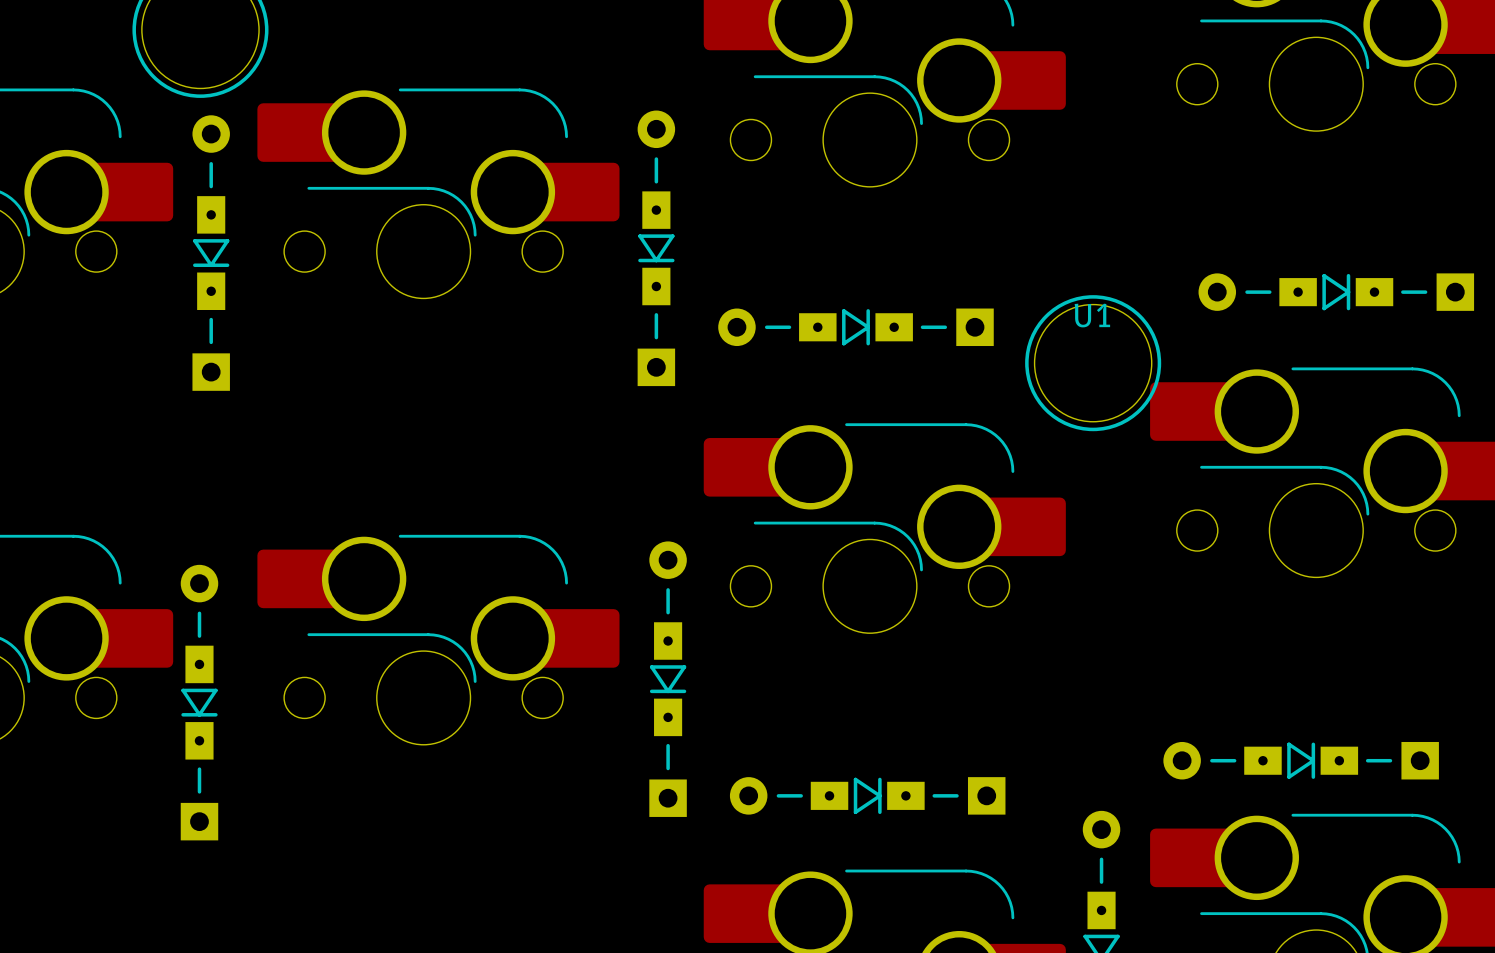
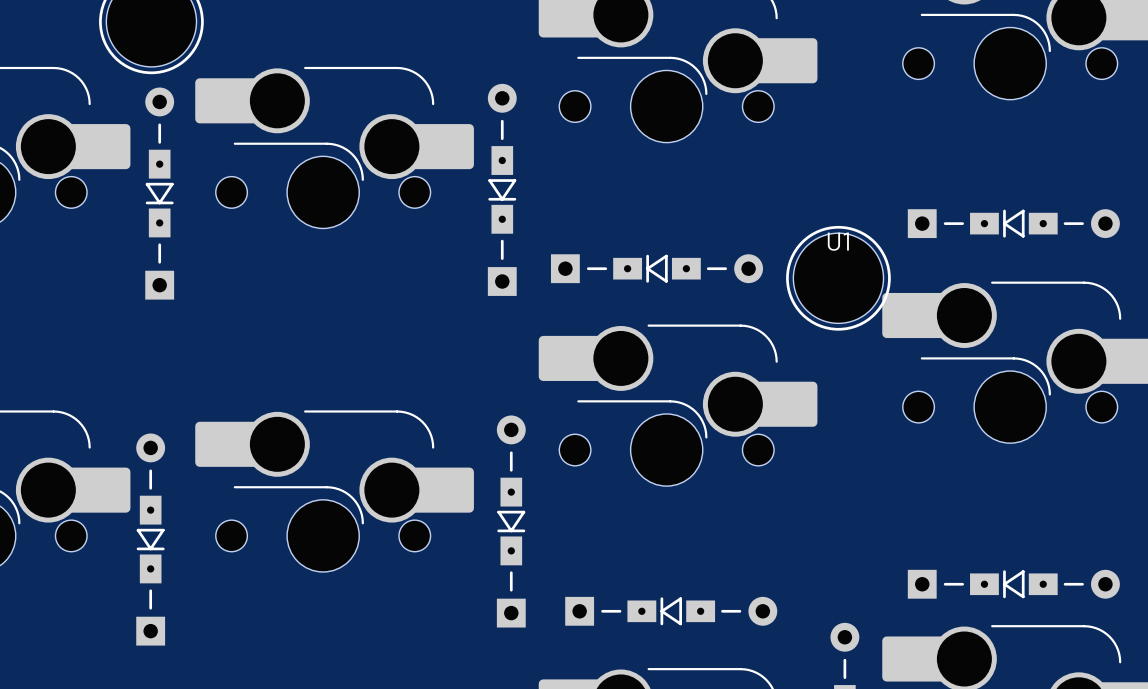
part rotation: 0° (1336, 292) -> 180° (1013, 223)
part rotation: 0° (855, 327) -> 180° (657, 268)
part rotation: 0° (1301, 760) -> 180° (1013, 584)
part rotation: 0° (867, 795) -> 180° (671, 611)

